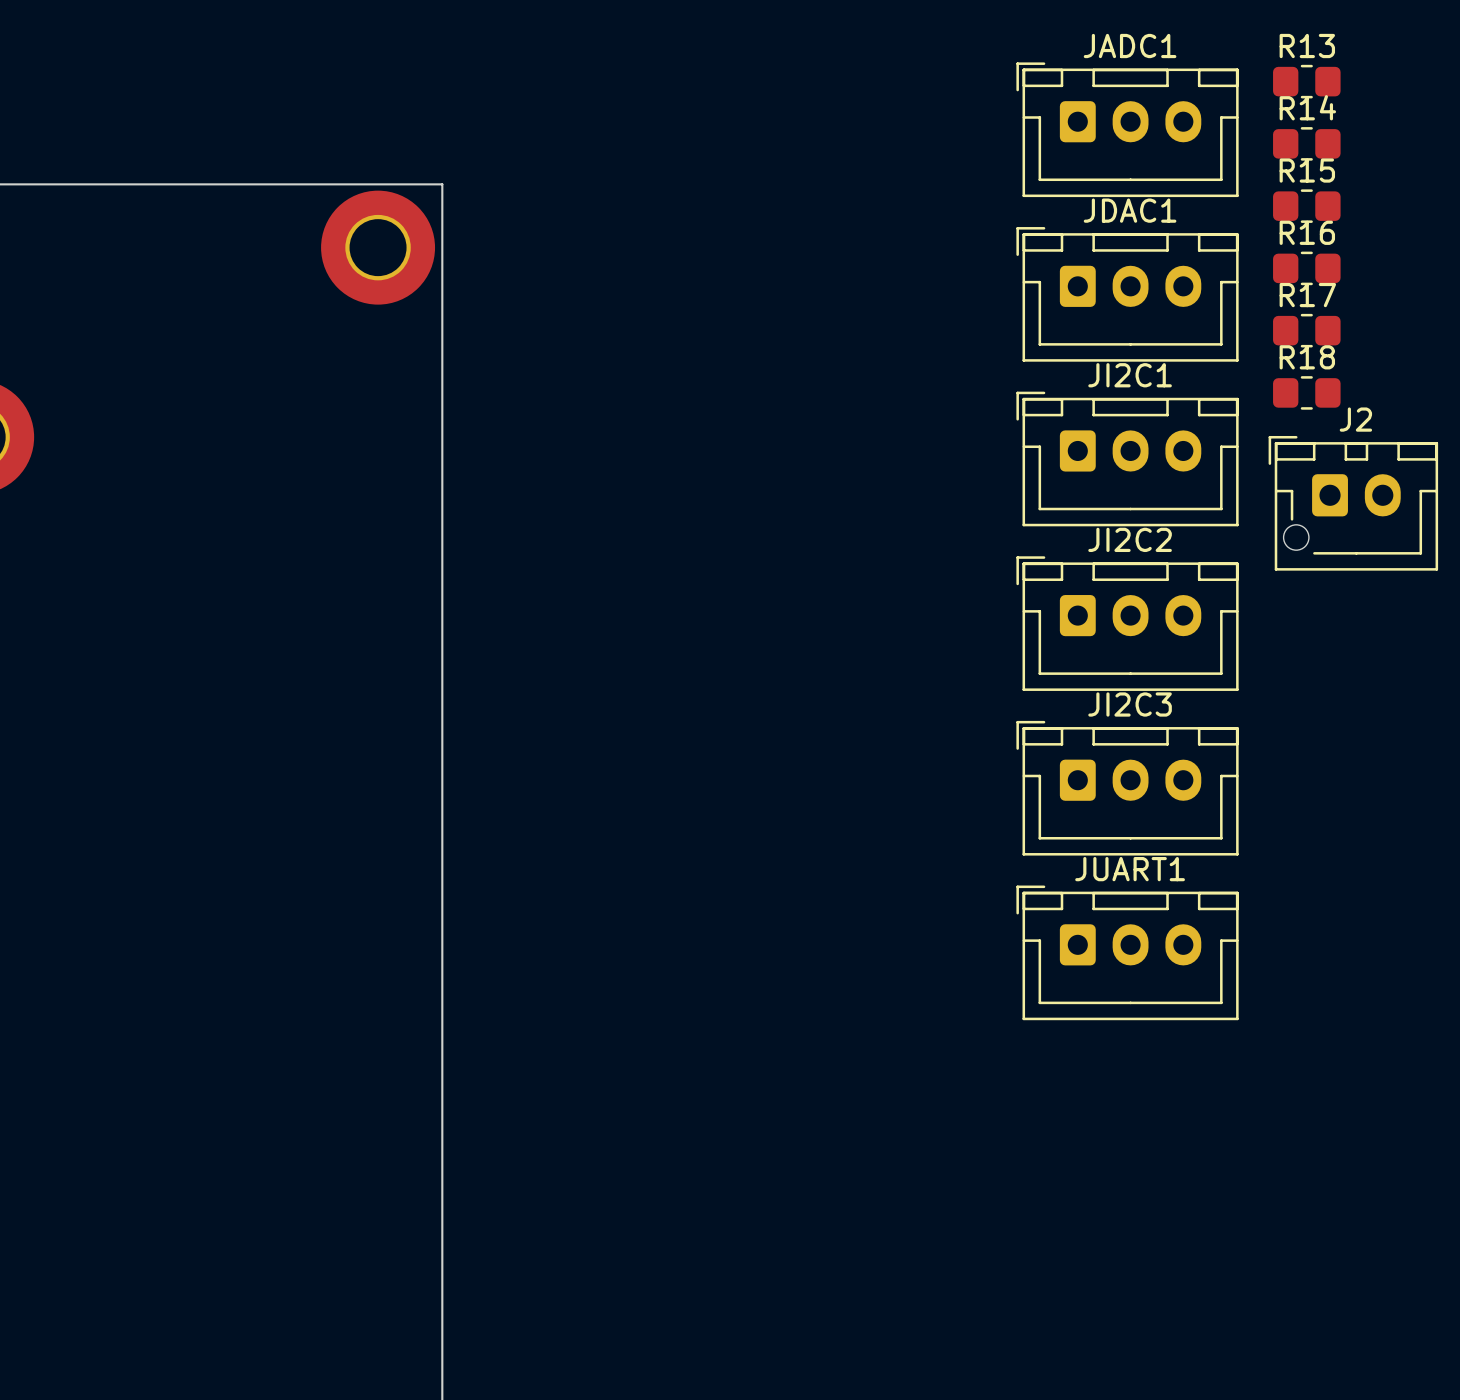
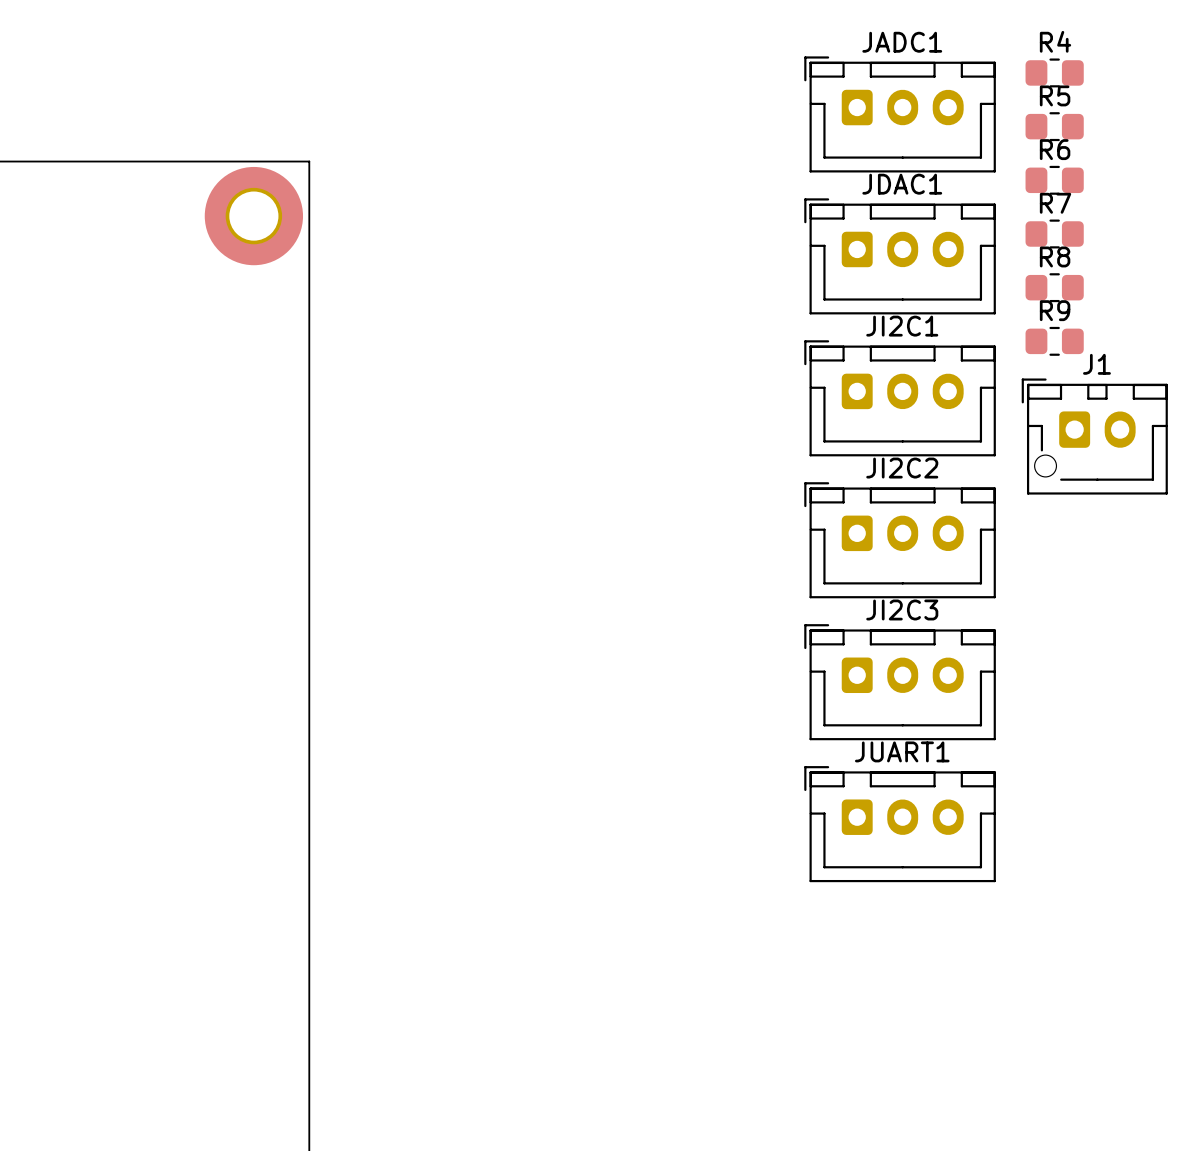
R13 name: R13 (1307, 46) -> R4 (1055, 41)
R14 name: R14 (1307, 107) -> R5 (1055, 95)
R15 name: R15 (1307, 170) -> R6 (1055, 149)
R16 name: R16 (1307, 232) -> R7 (1055, 203)
R17 name: R17 (1307, 295) -> R8 (1055, 256)
R18 name: R18 (1307, 357) -> R9 (1055, 310)
J2 name: J2 (1355, 419) -> J1 (1096, 364)

